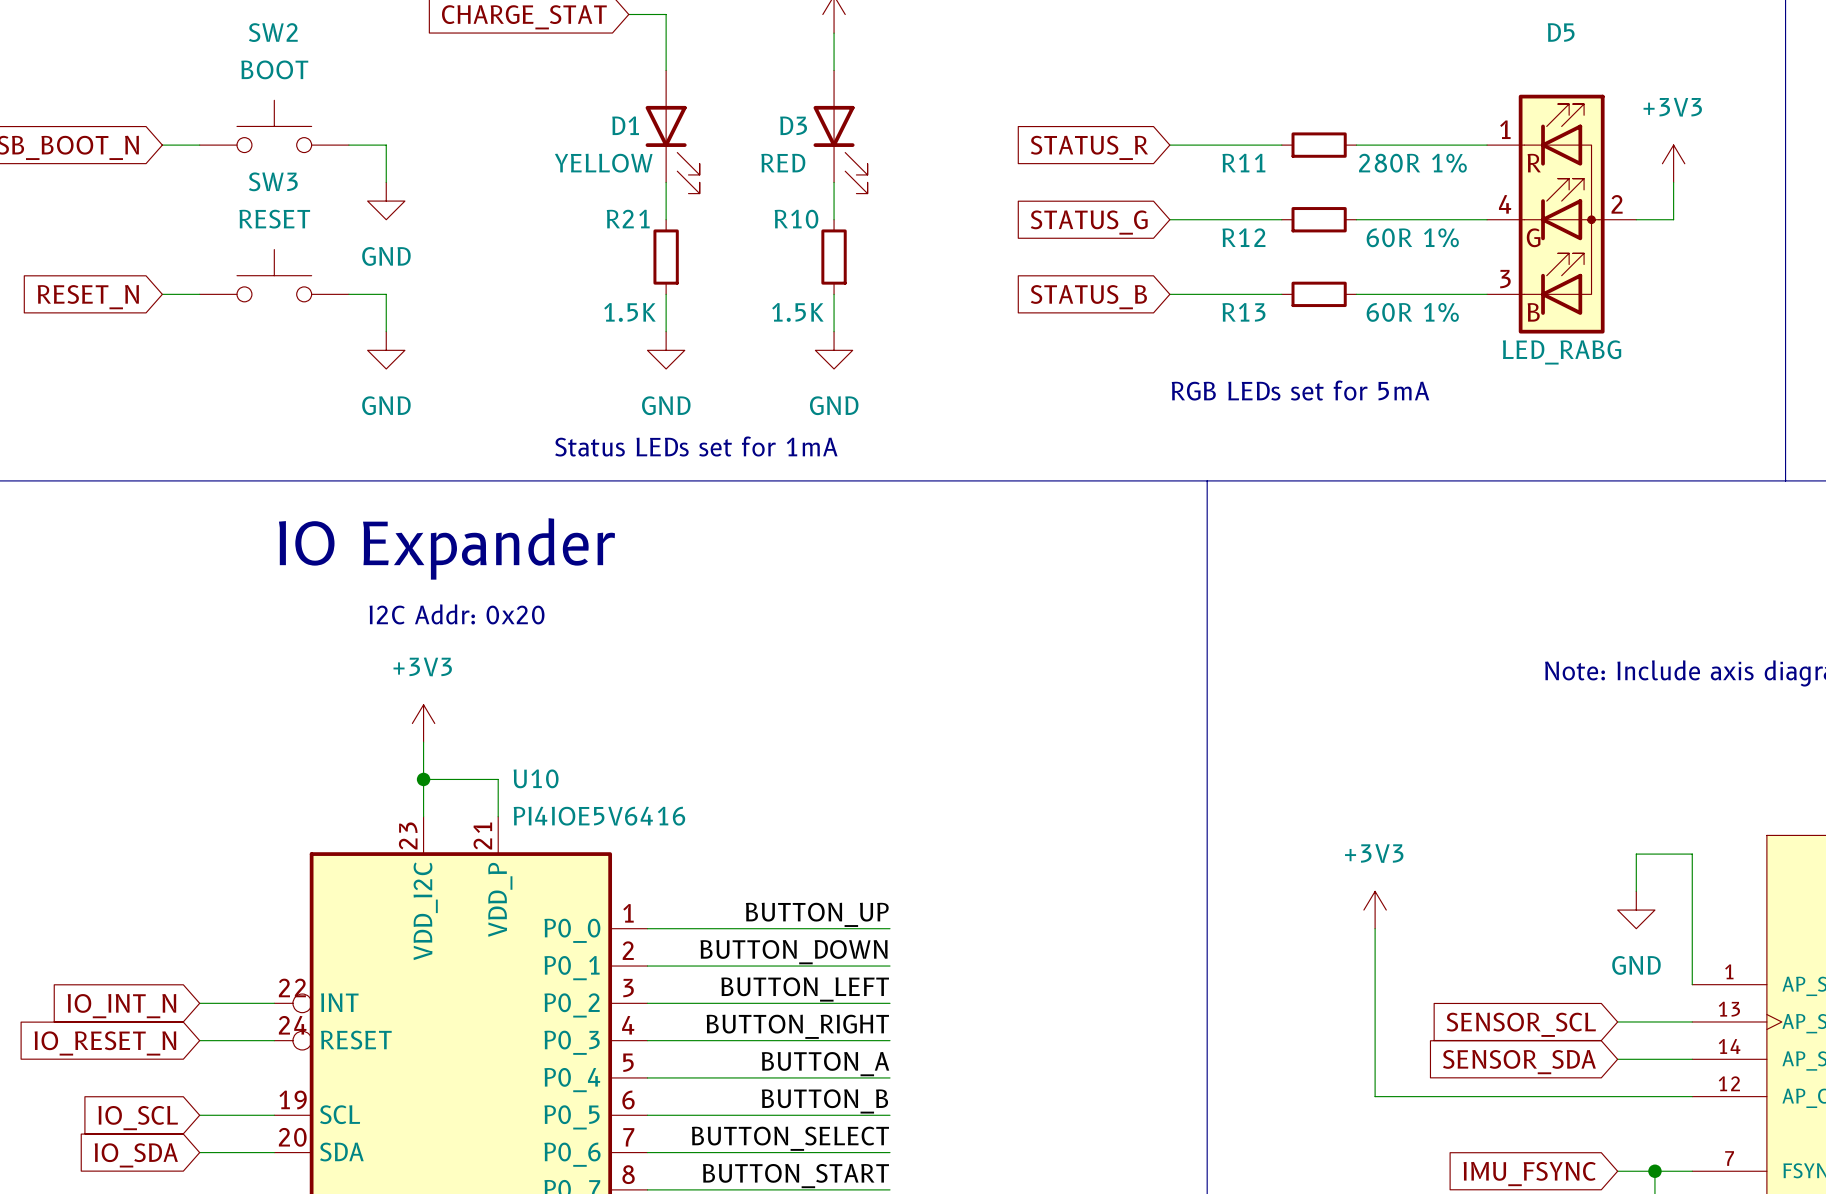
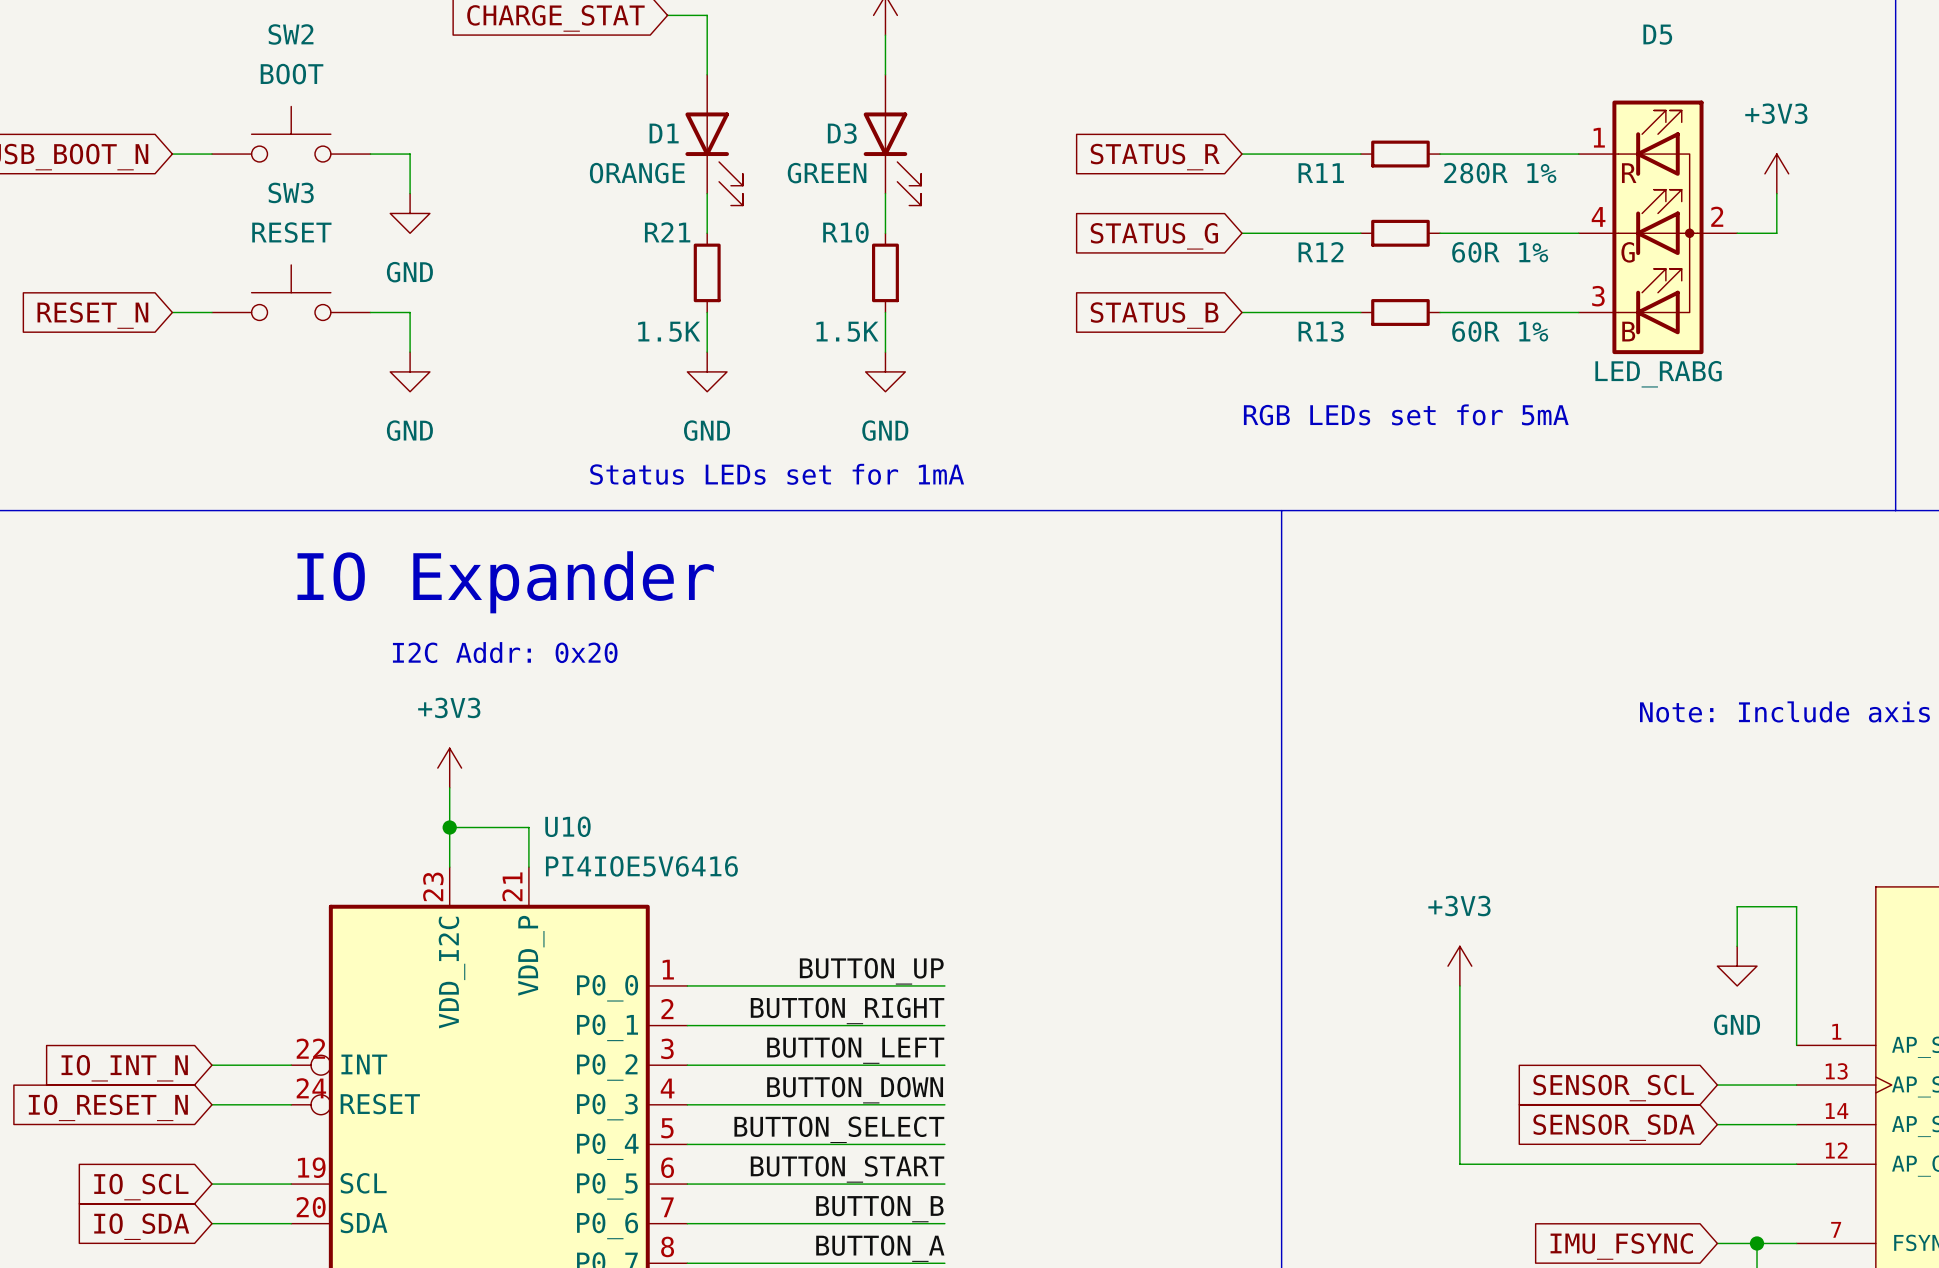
D1 value: YELLOW (603, 163) -> ORANGE (637, 173)
D3 value: RED (783, 163) -> GREEN (827, 173)
label: BUTTON_DOWN (793, 952) -> BUTTON_RIGHT (847, 1010)
label: BUTTON_RIGHT (797, 1026) -> BUTTON_DOWN (855, 1090)
label: BUTTON_A (825, 1064) -> BUTTON_SELECT (839, 1129)
label: BUTTON_B (824, 1101) -> BUTTON_START (847, 1169)
label: BUTTON_SELECT (790, 1138) -> BUTTON_B (879, 1209)
label: BUTTON_START (795, 1176) -> BUTTON_A (880, 1248)

